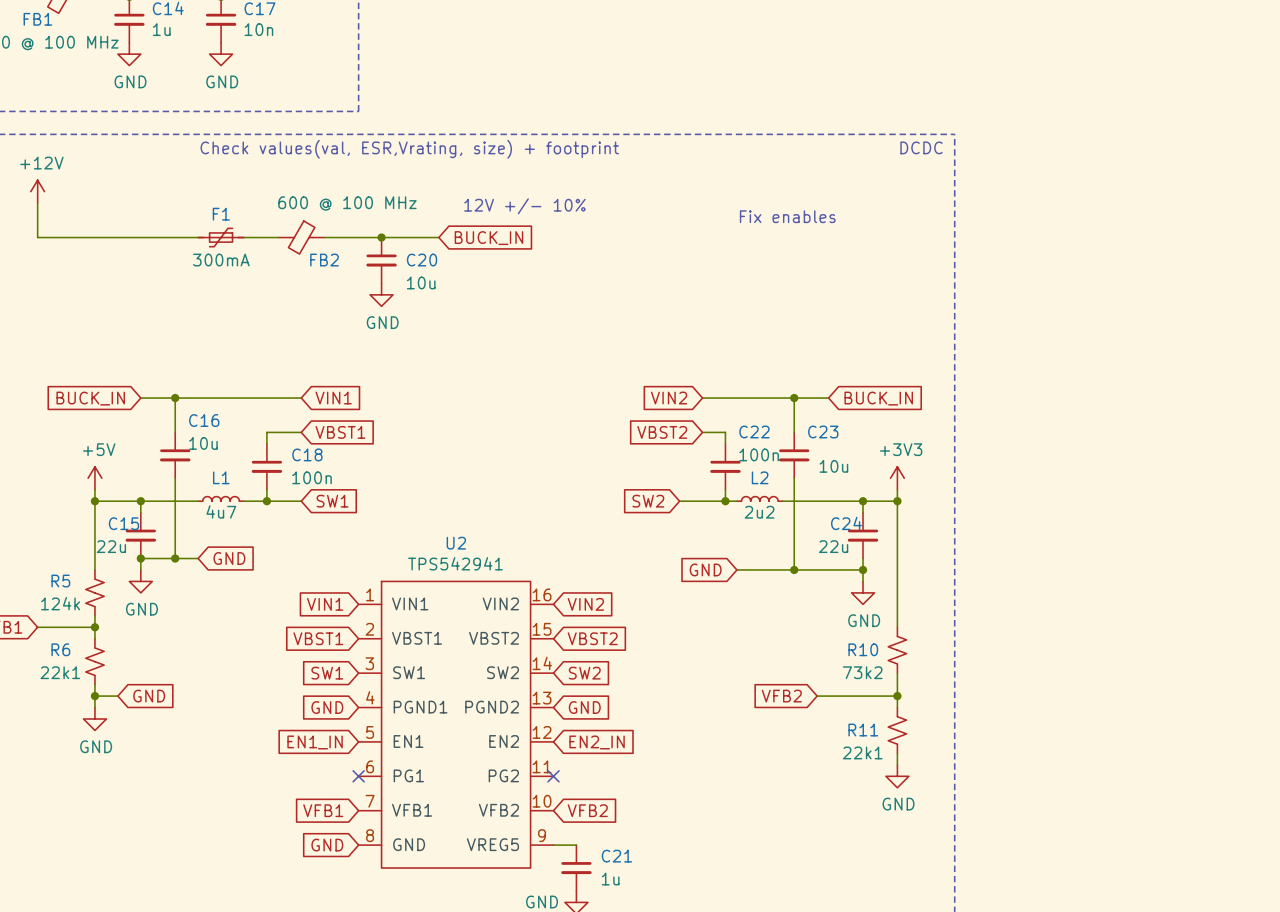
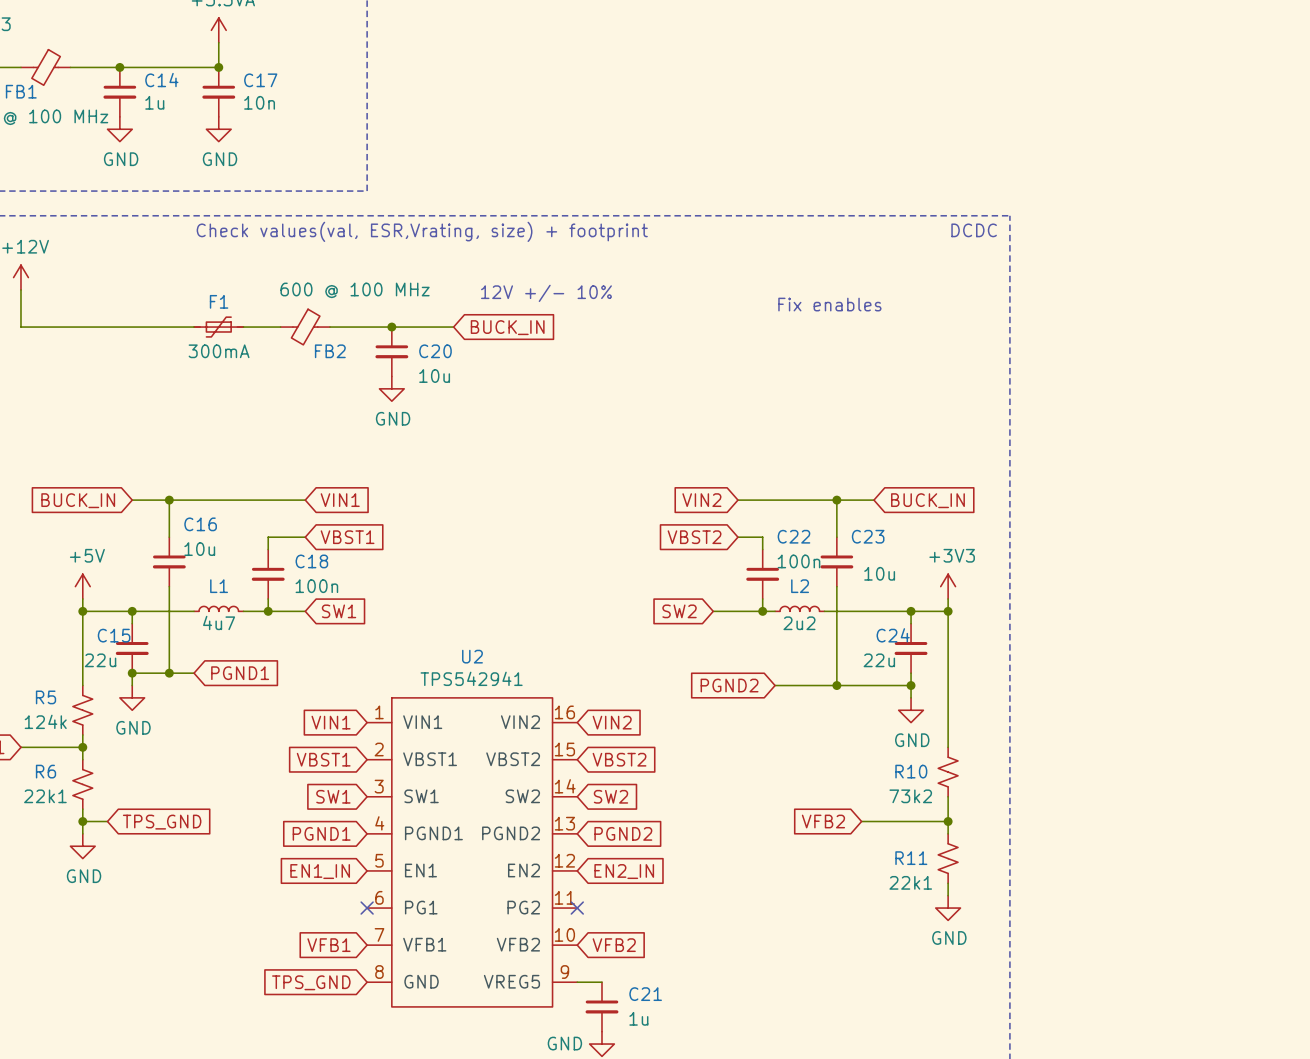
global label: GND (229, 558) -> PGND1 (240, 673)
global label: GND (705, 569) -> PGND2 (729, 685)
global label: GND (149, 696) -> TPS_GND (162, 822)
global label: GND (327, 707) -> PGND1 (321, 833)
global label: GND (584, 707) -> PGND2 (623, 833)
global label: GND (327, 845) -> TPS_GND (311, 982)

